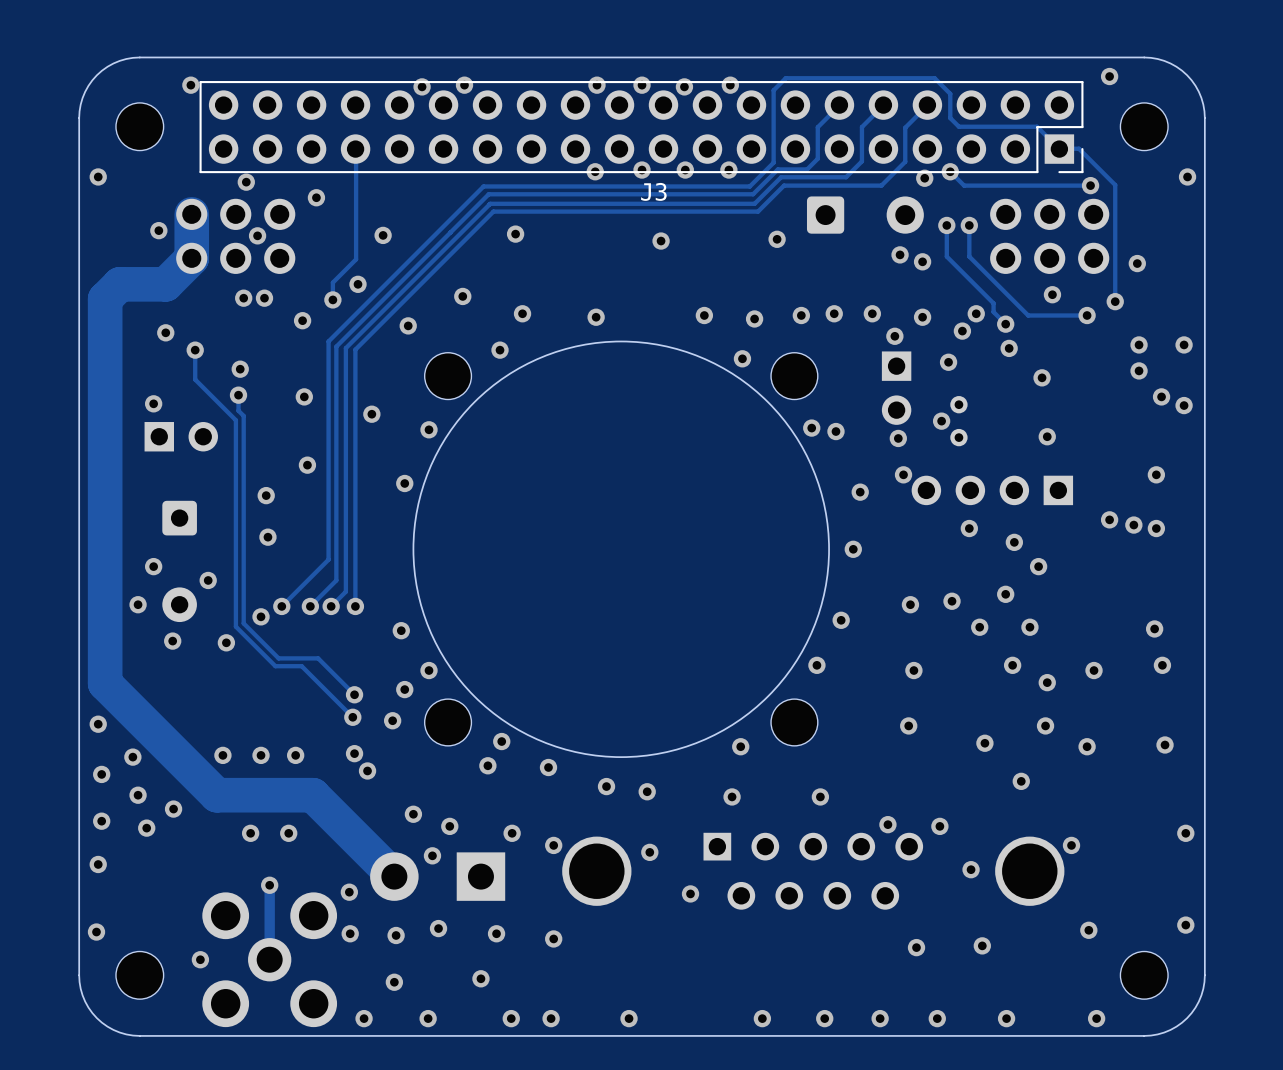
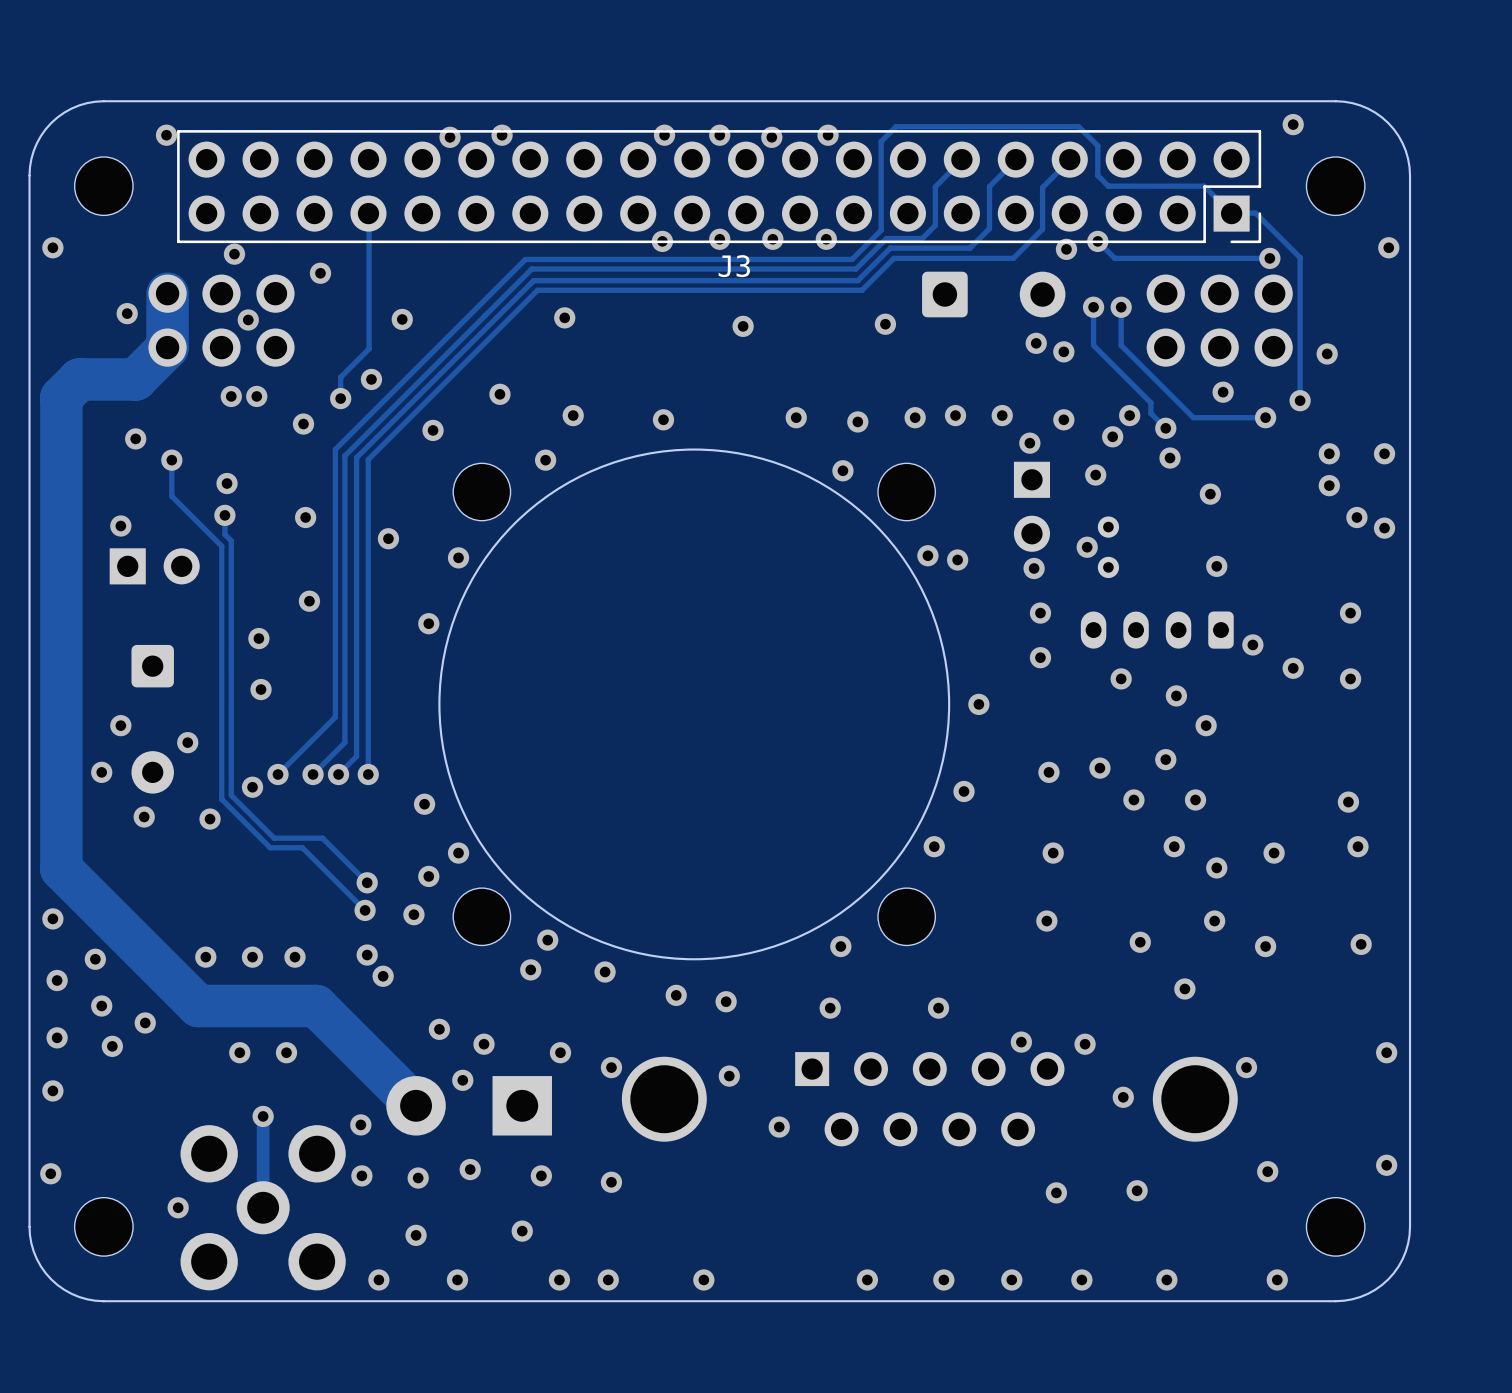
part footprint: [911, 475, 1074, 506] -> [1080, 611, 1234, 649]
via position: (860, 492) -> (1040, 657)
via position: (1133, 525) -> (1252, 644)

